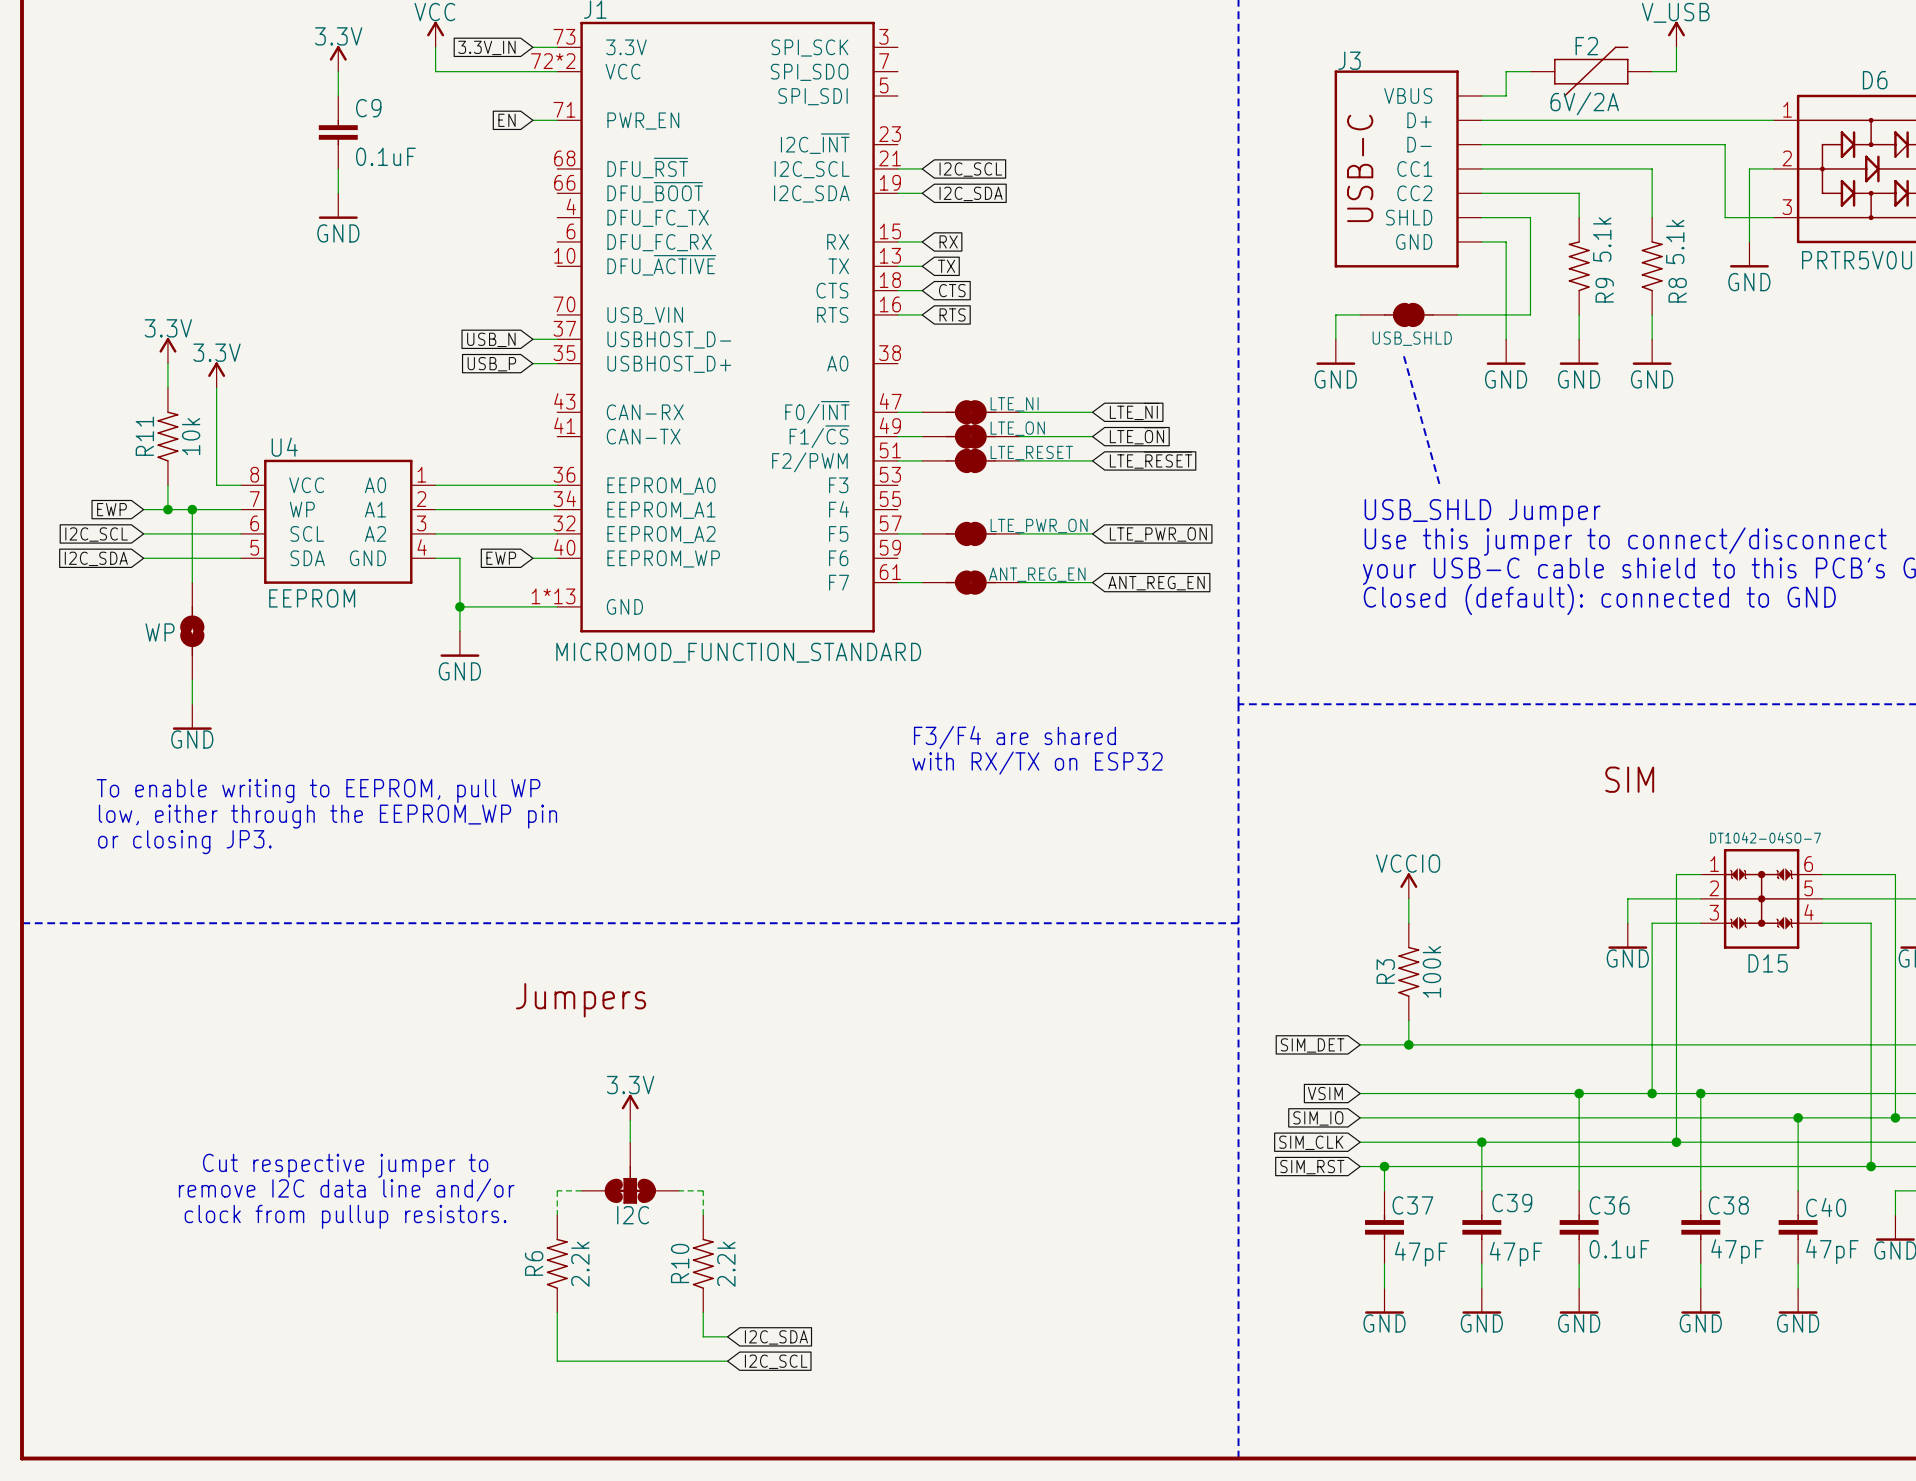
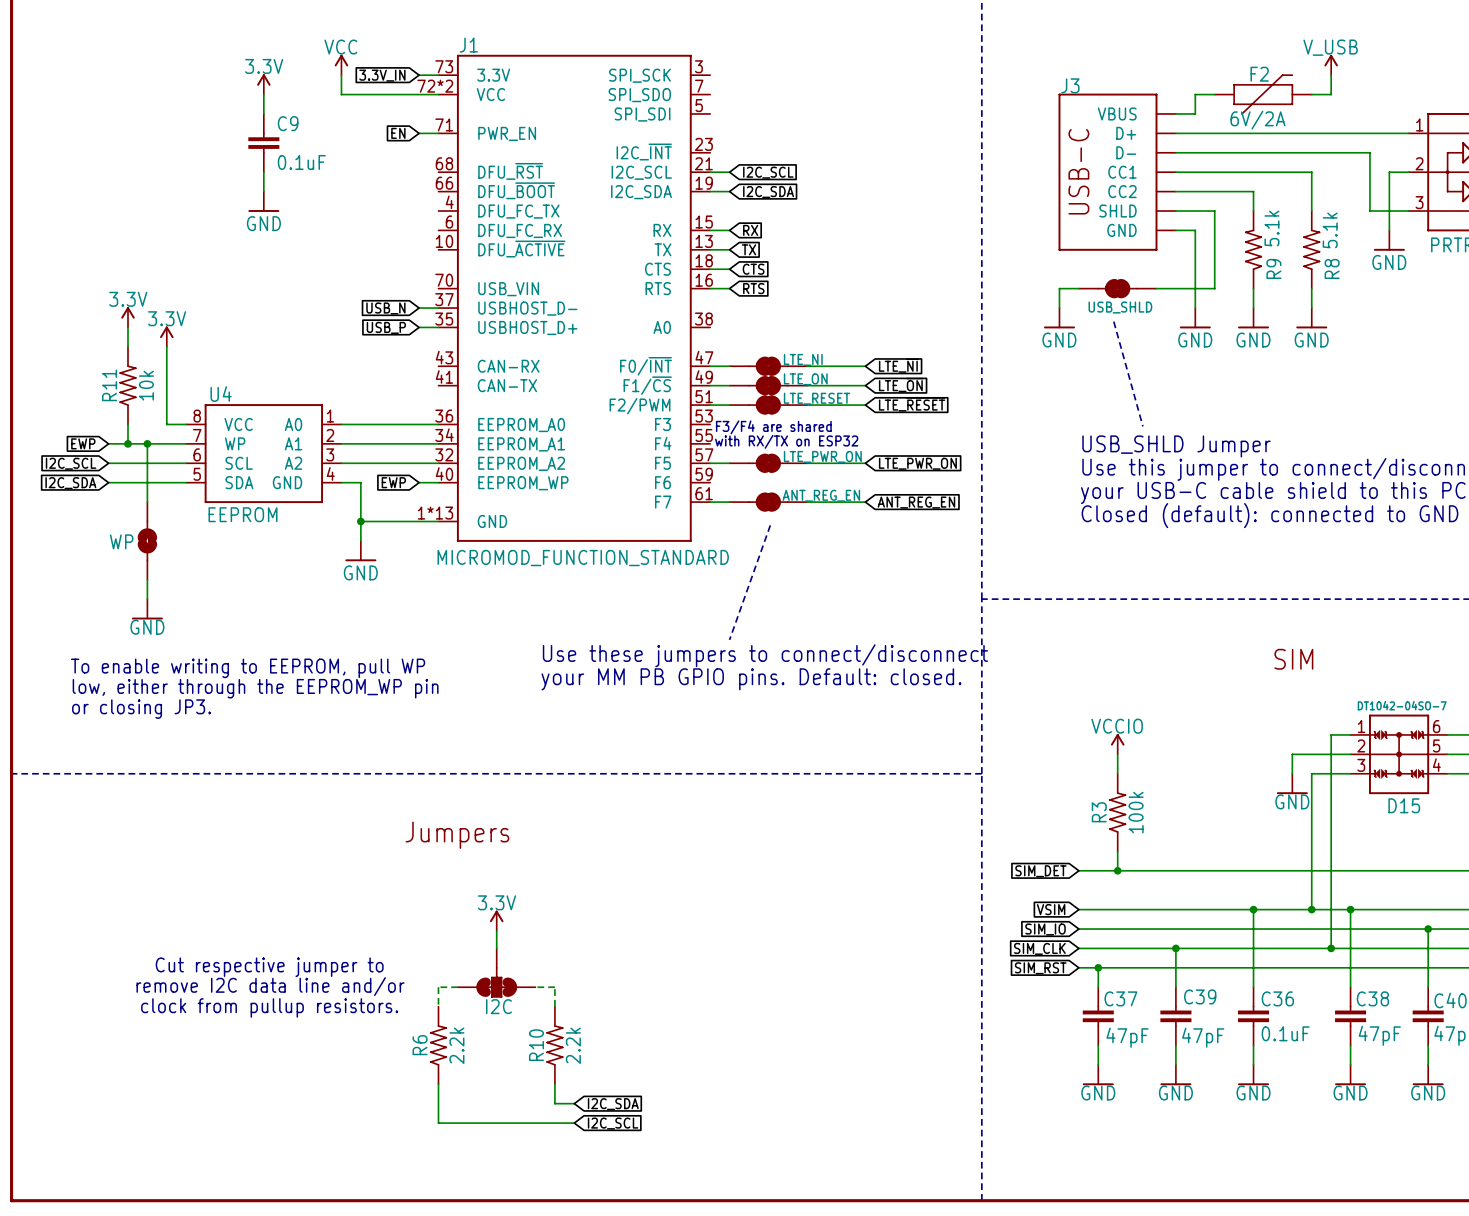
text: none -> F3/F4 are shared (773, 427)
text: none -> with RX/TX on ESP32 (786, 441)
line: none -> (770, 525) (729, 639)
text: F3/F4 are shared (1014, 737) -> none
text: with RX/TX on ESP32 (1037, 763) -> none
text: none -> Use these jumpers to connect/disconnect (765, 655)
text: none -> your MM PB GPIO pins. Default: closed. (751, 679)

